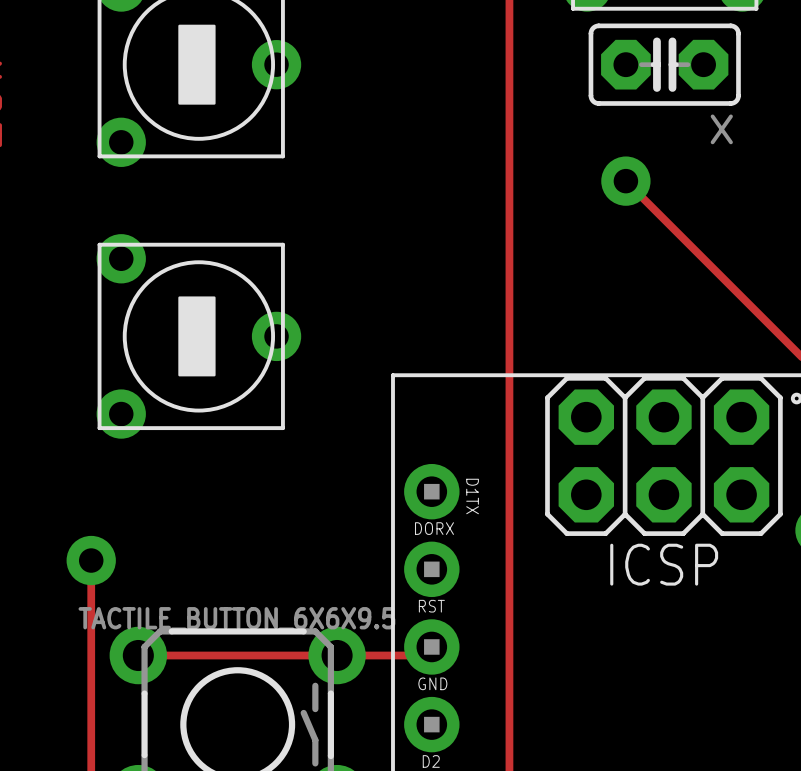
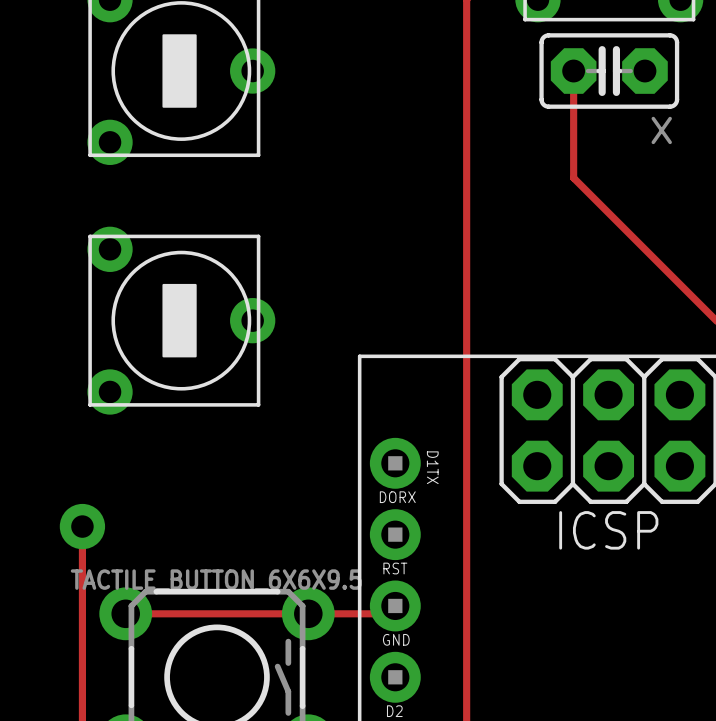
track: none -> (573, 71) (573, 178)
via: (625, 181) -> none

